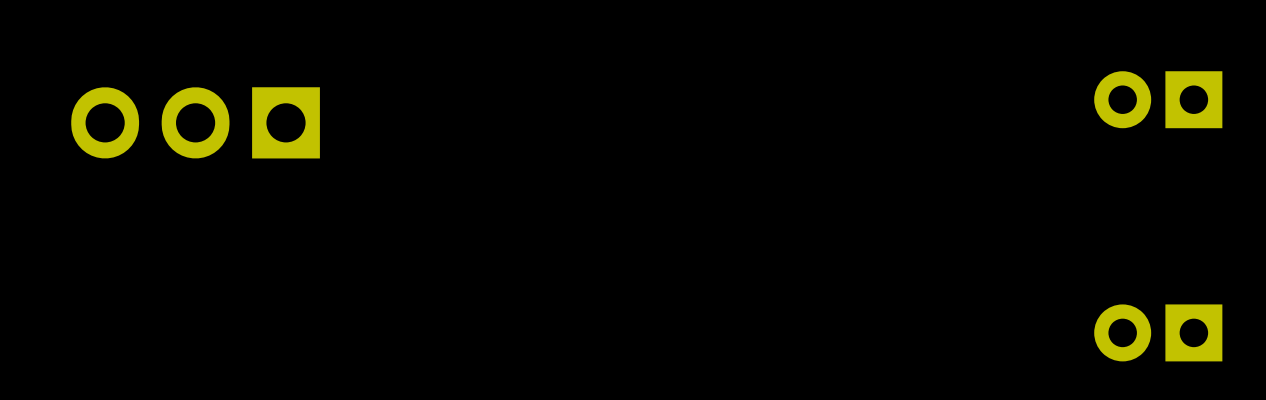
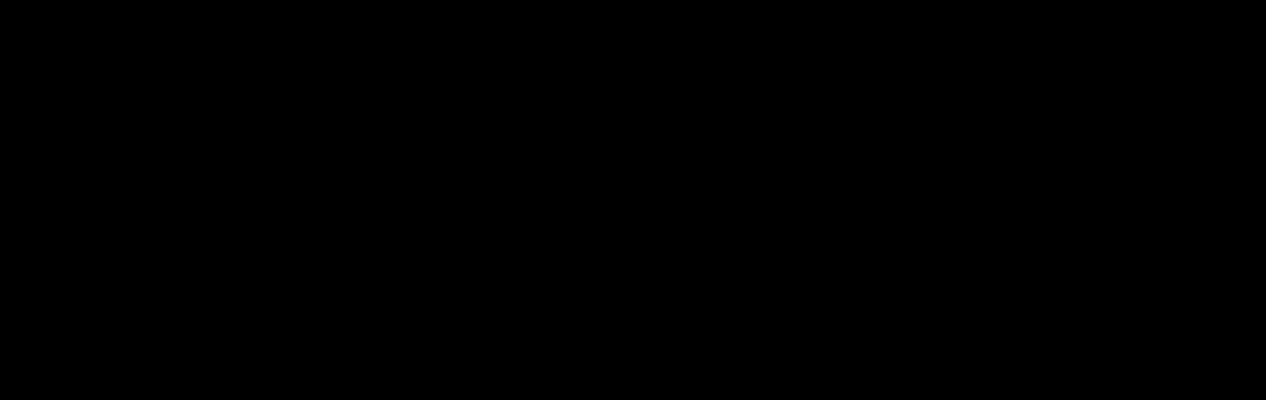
part: (1158, 99) -> none
part: (195, 122) -> none
part: (1158, 332) -> none

